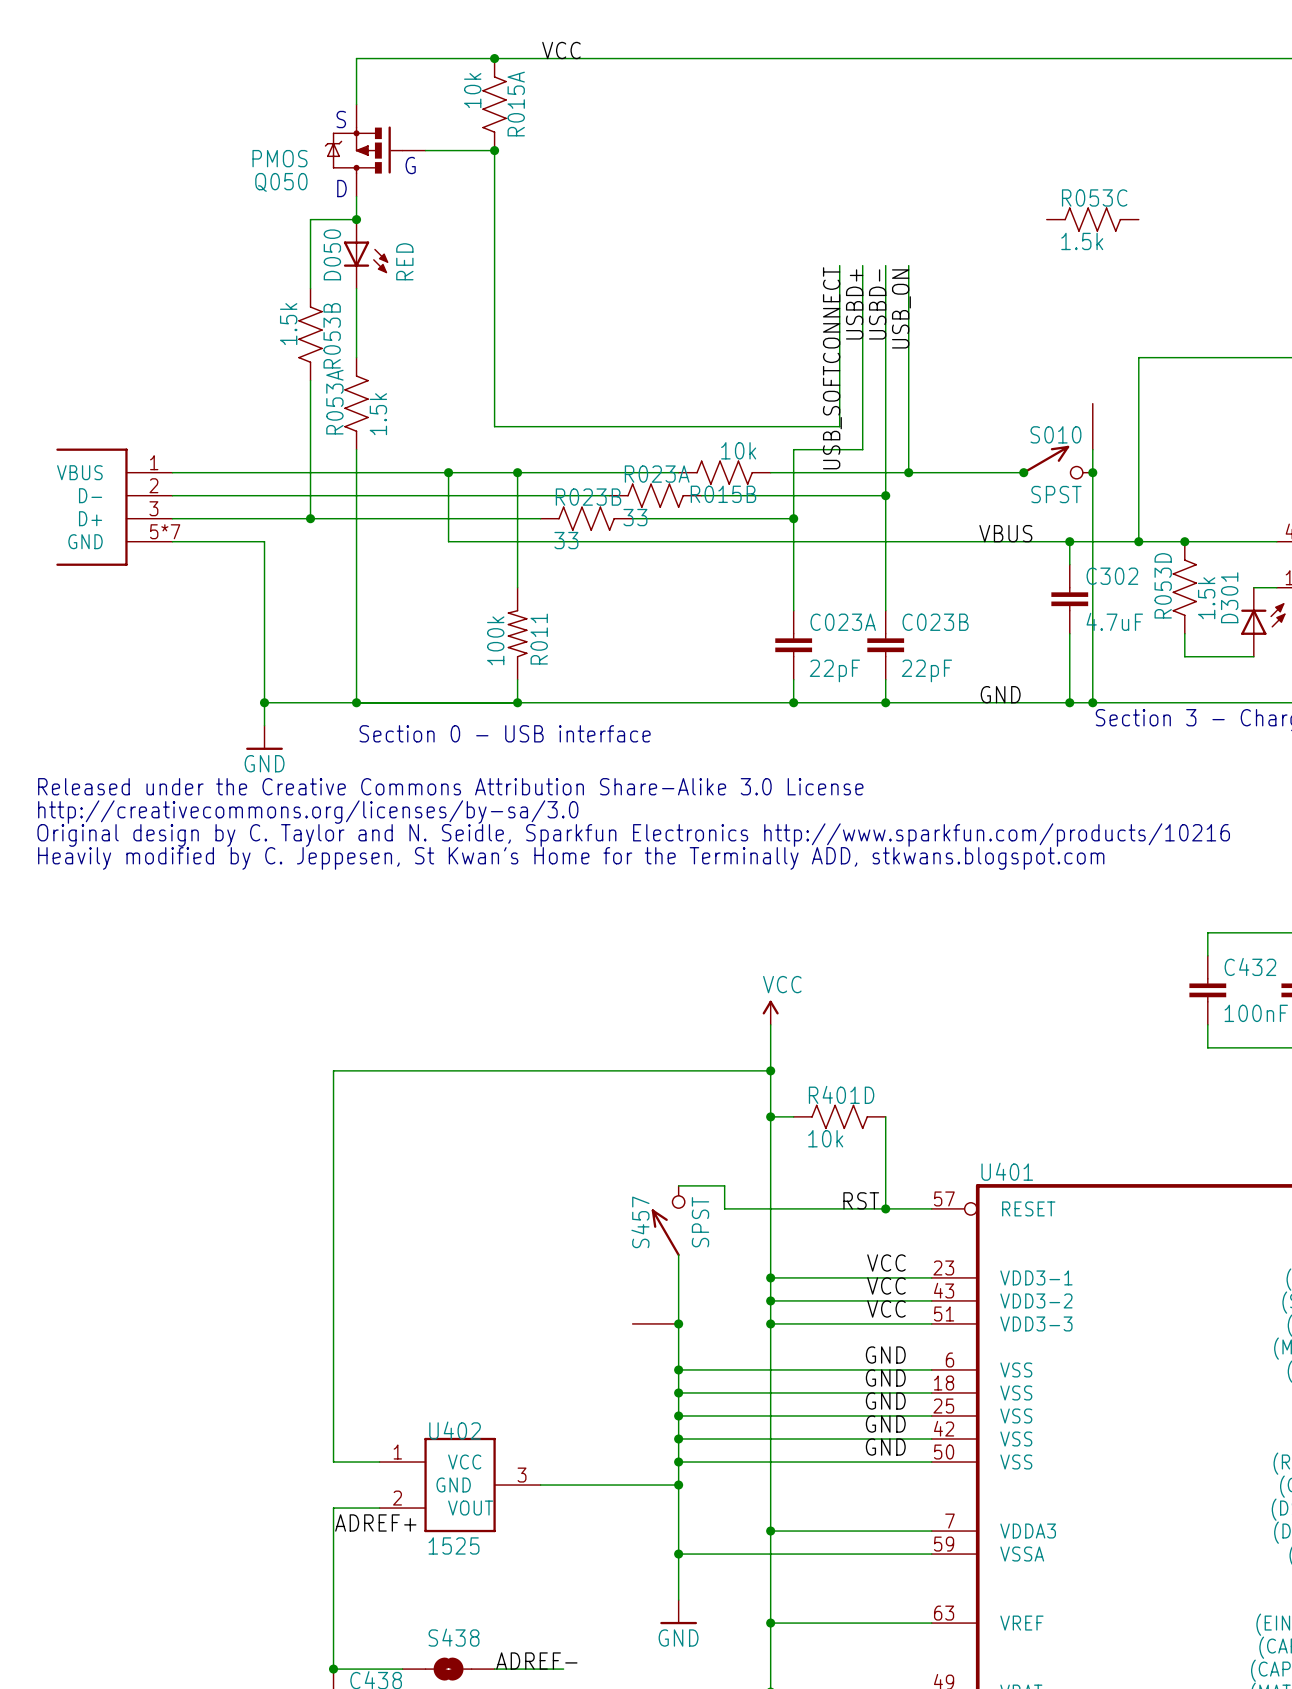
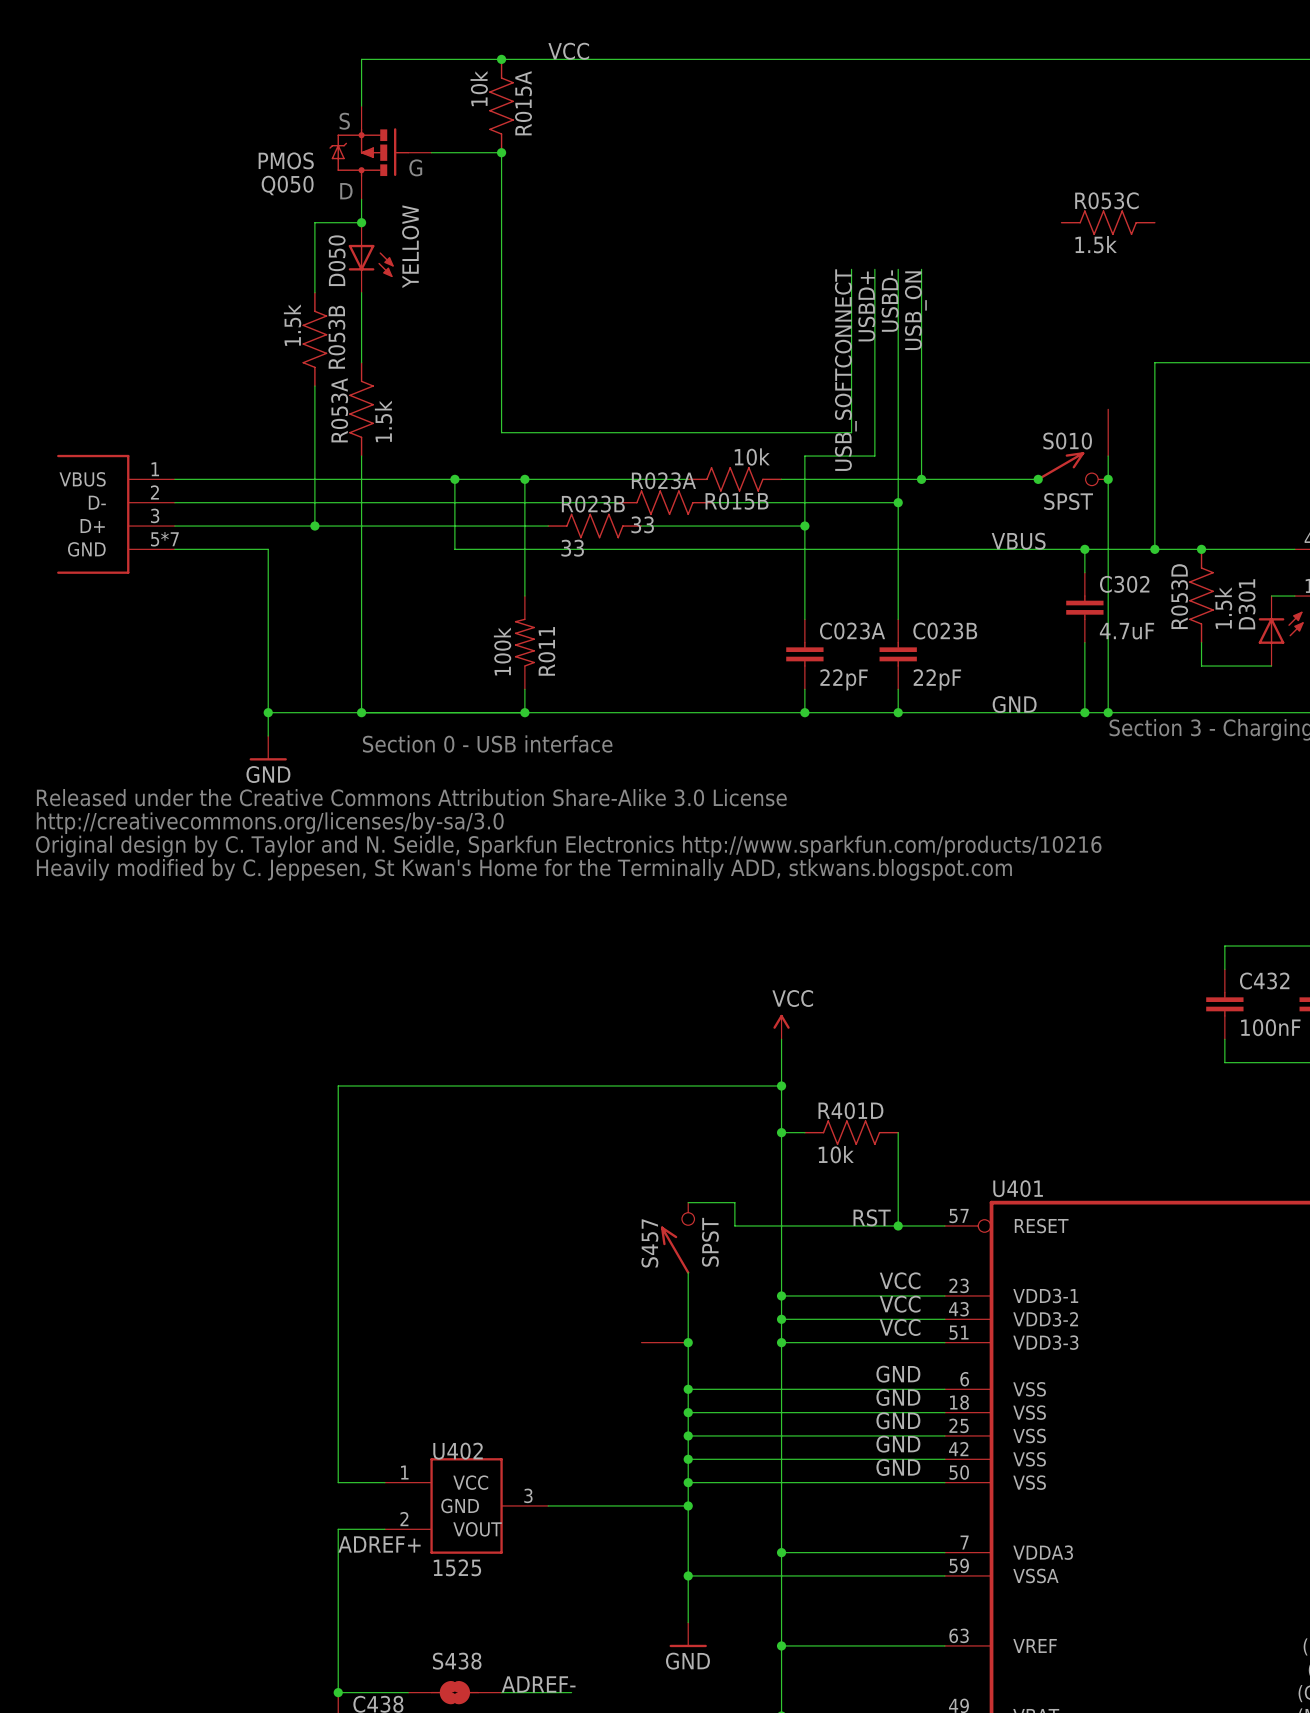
D050 value: RED (404, 261) -> YELLOW (410, 246)

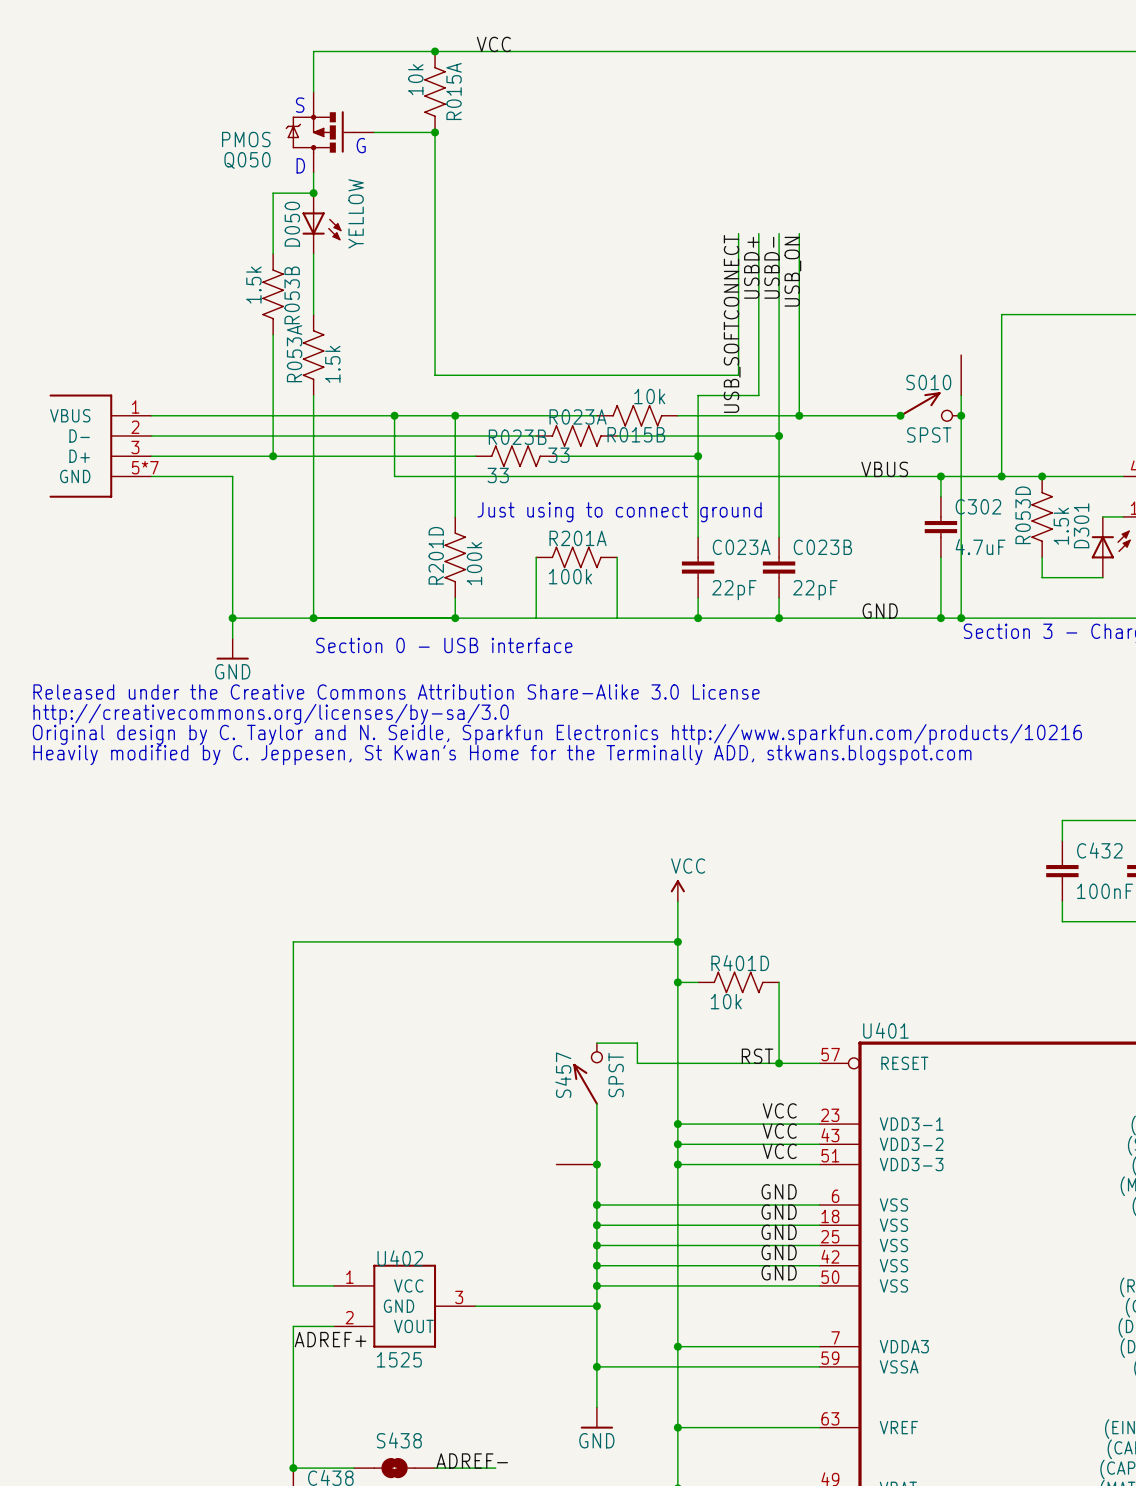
R053C: 1.5k (1108, 222) -> none
text: none -> Just using to connect ground (619, 512)
R011: 100k (524, 642) -> none
R201D: none -> 100k (455, 557)
wire: none -> (536, 557) (536, 618)
R201A: none -> 100k (576, 557)
wire: none -> (617, 557) (617, 618)

